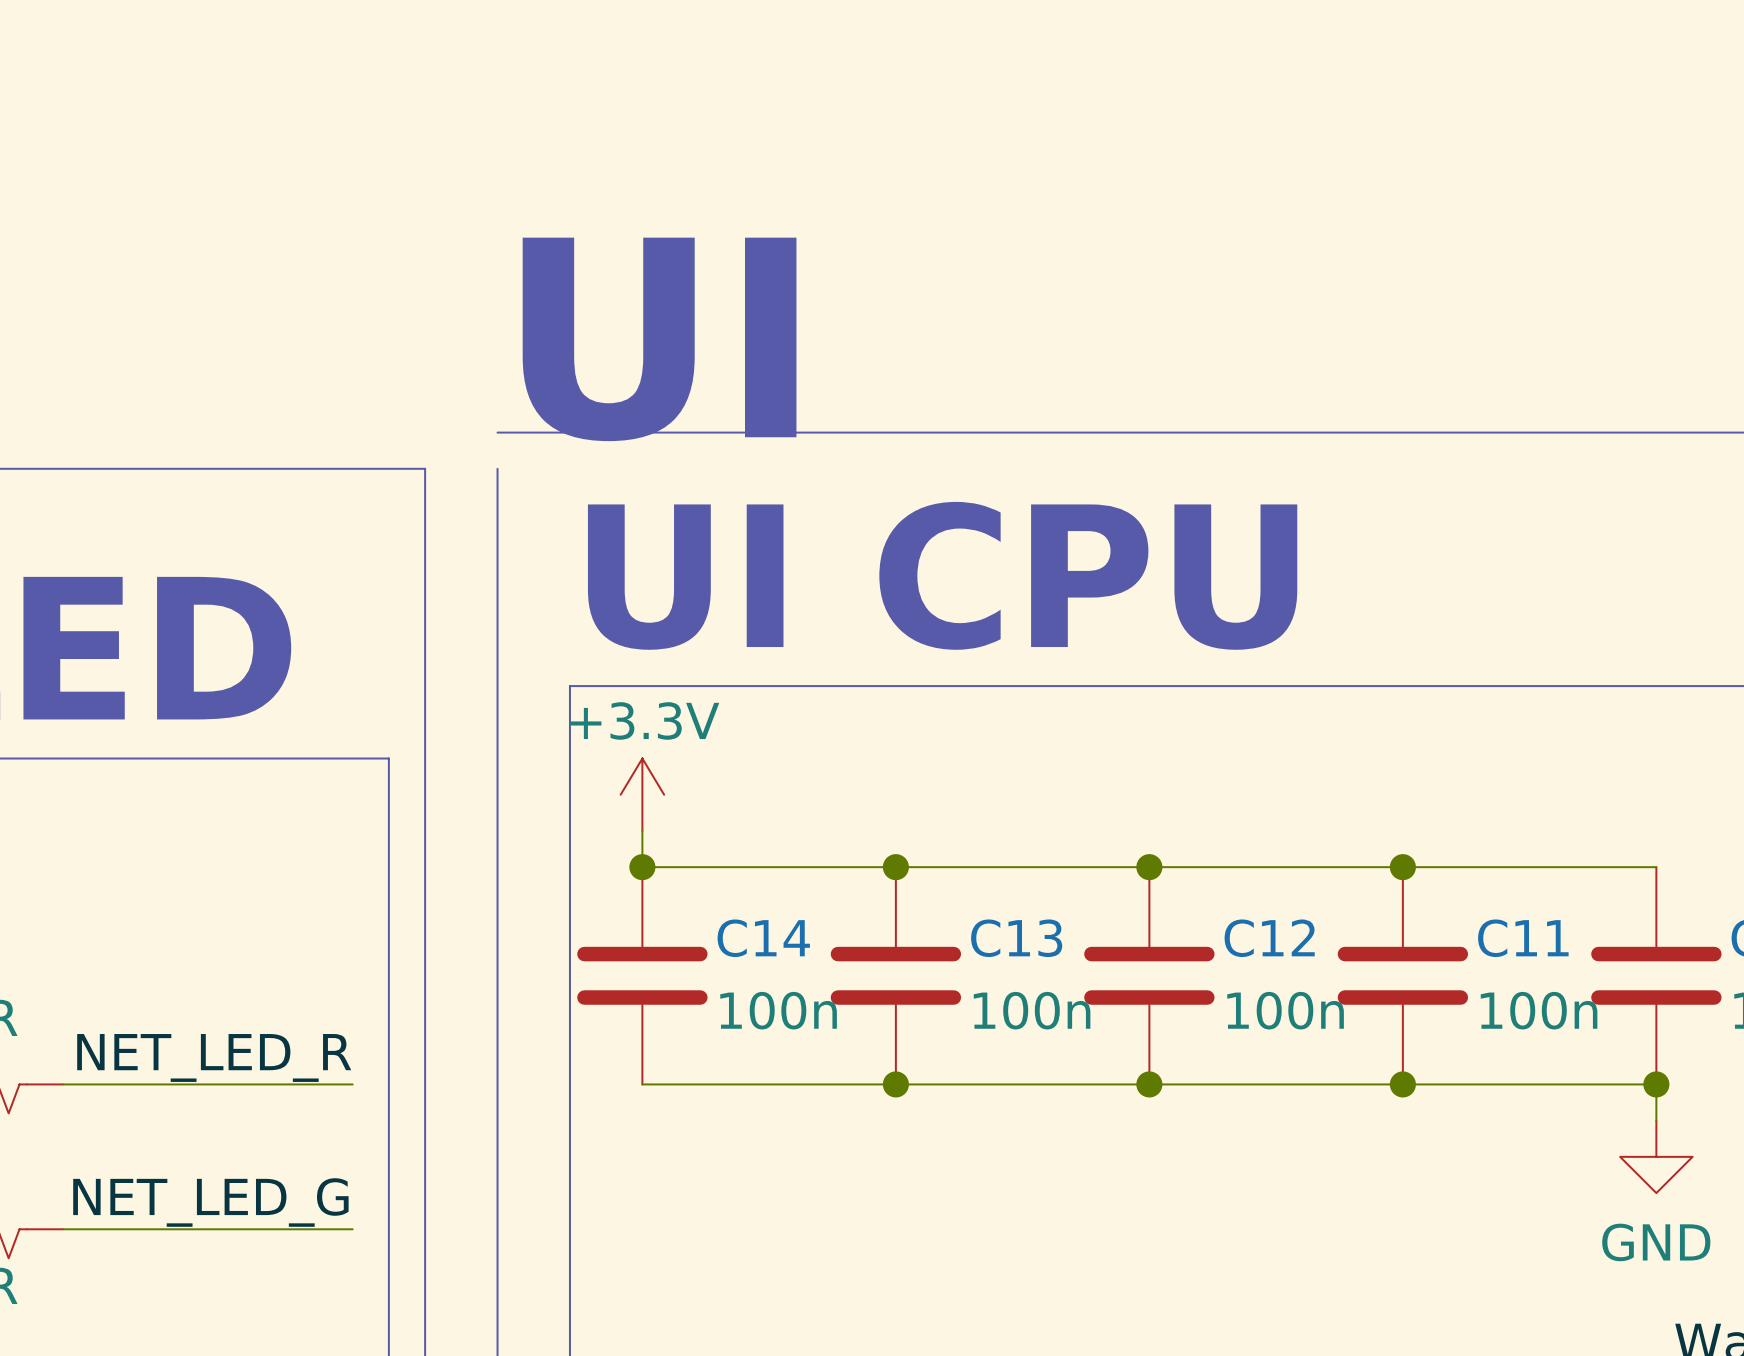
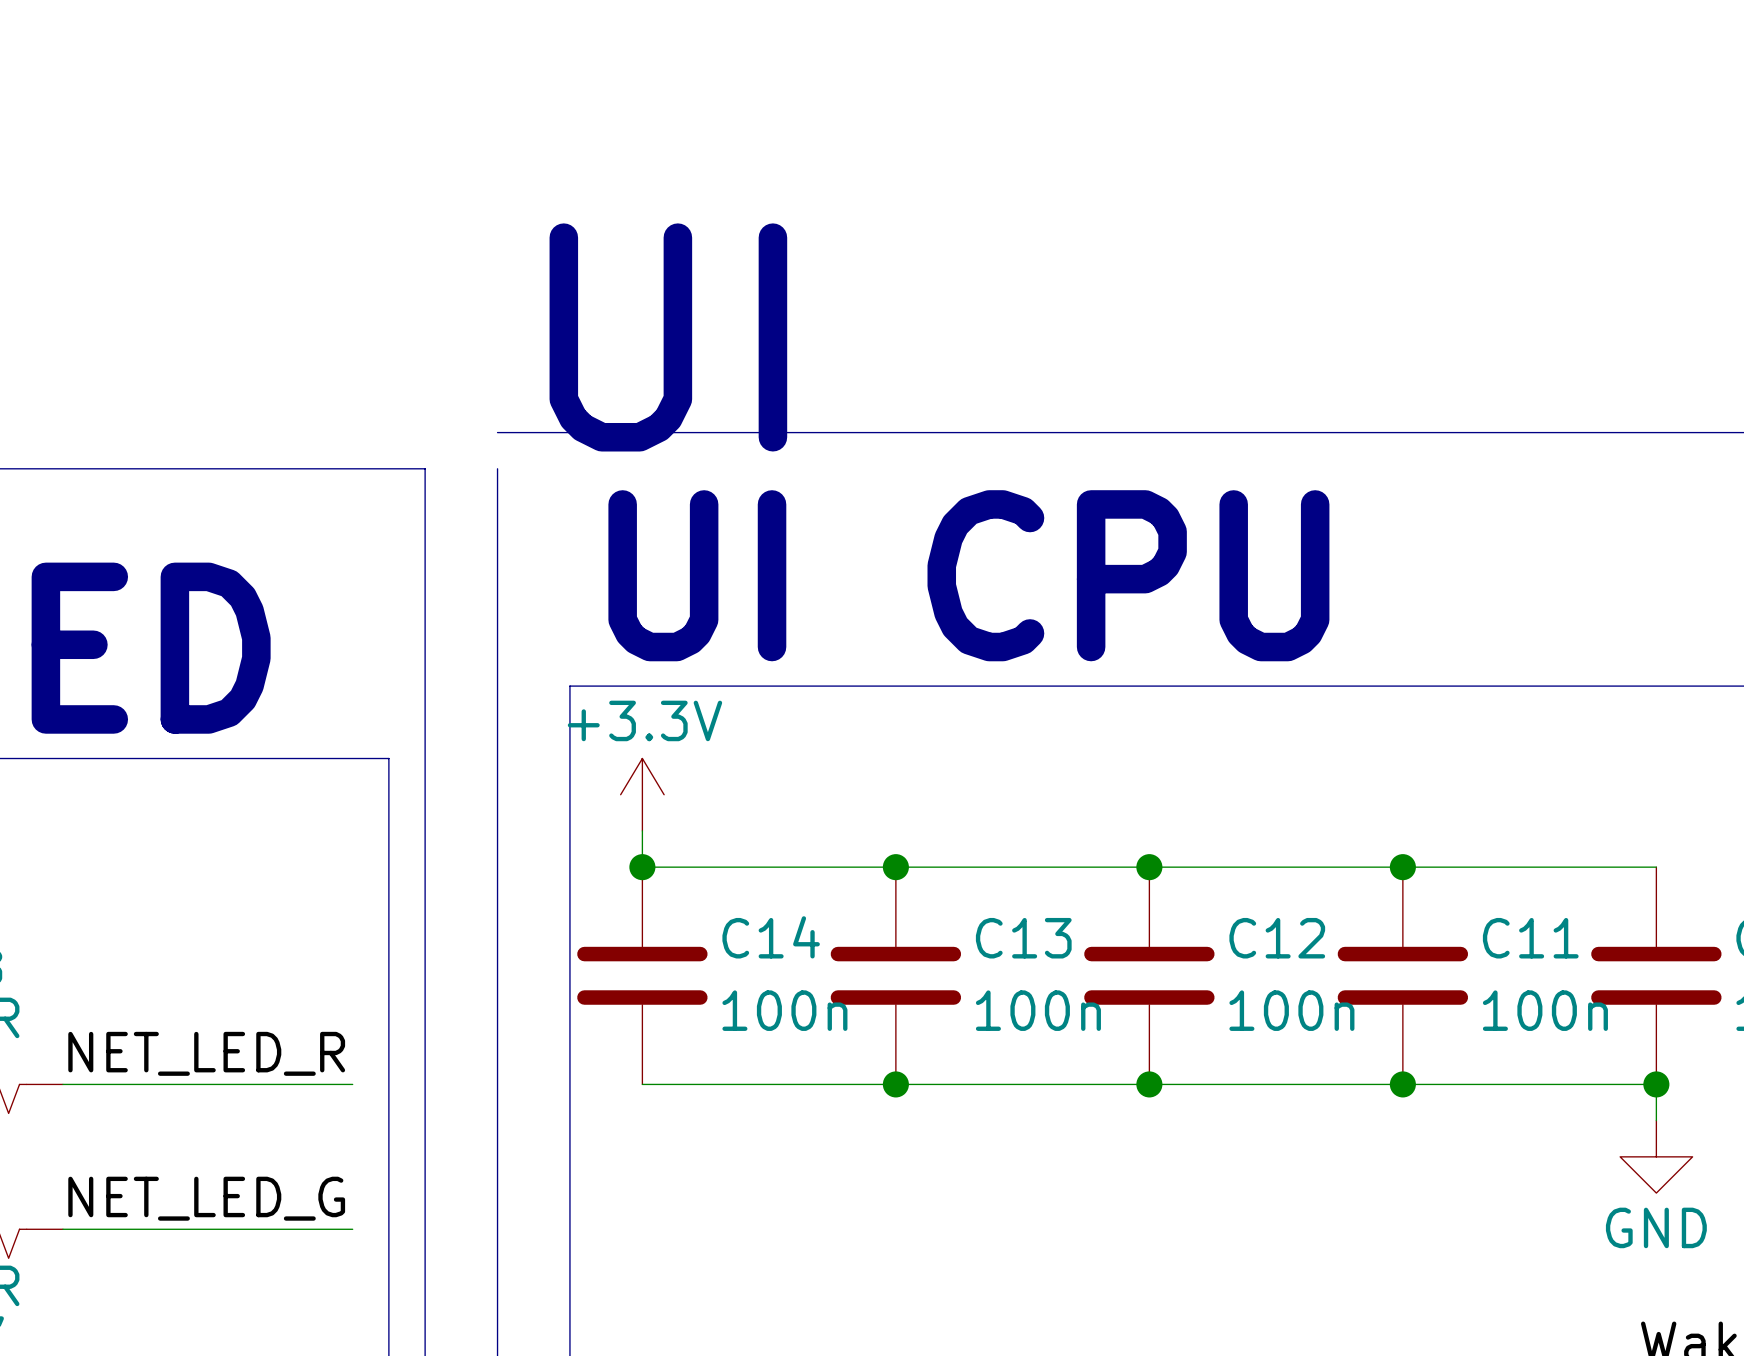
power symbol text position: GND (1656, 1242) -> GND (1656, 1227)

